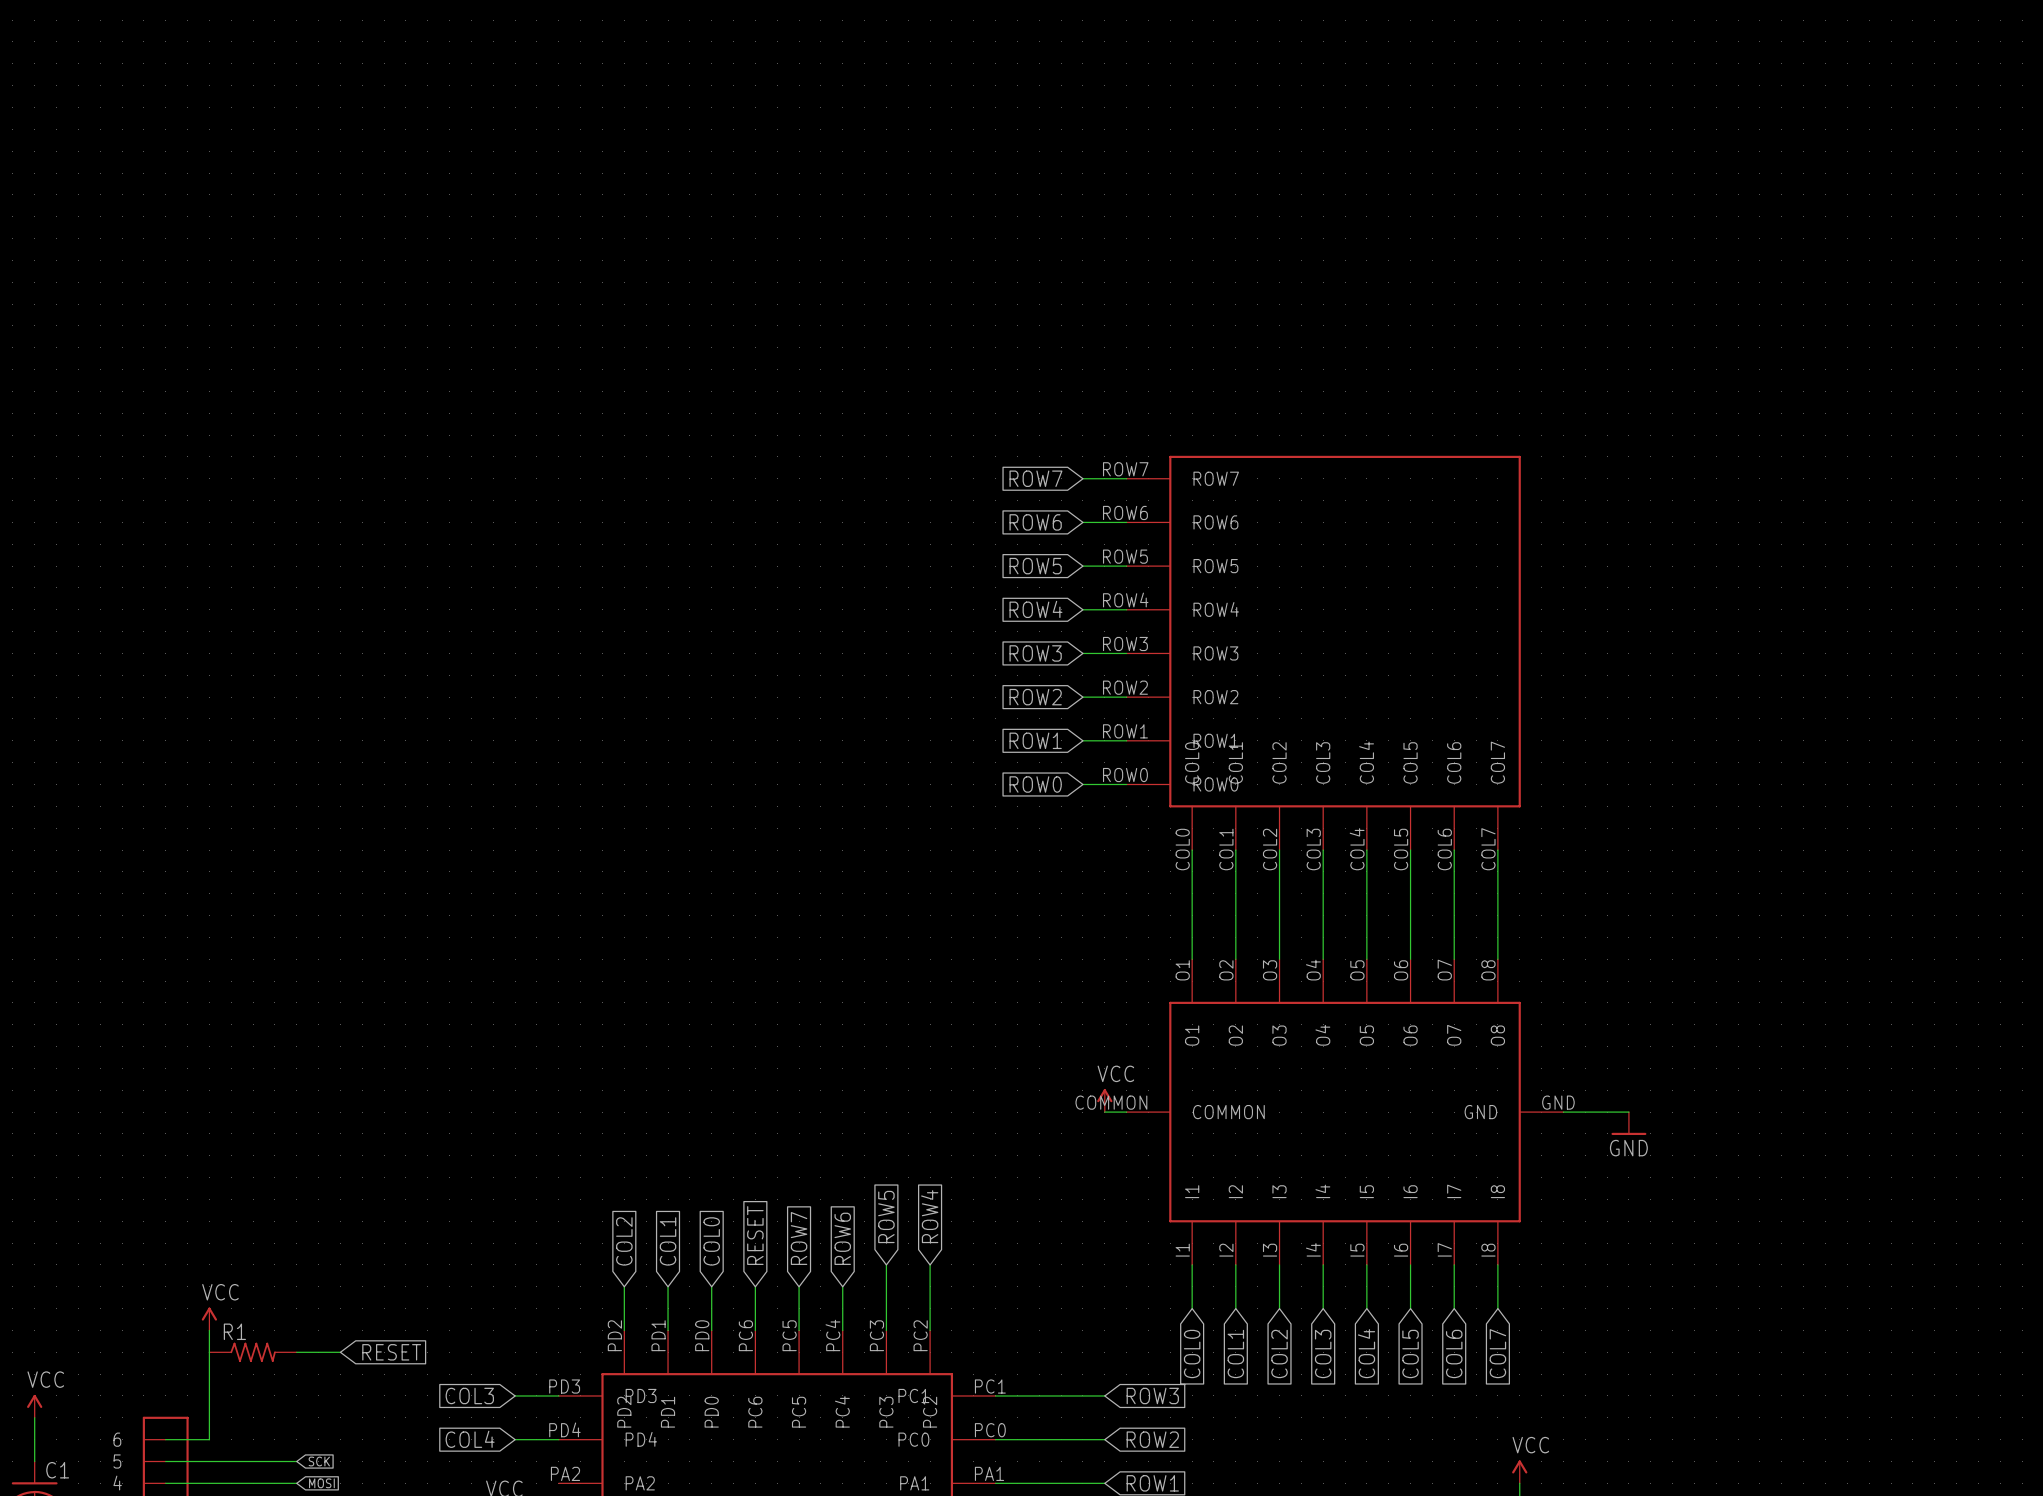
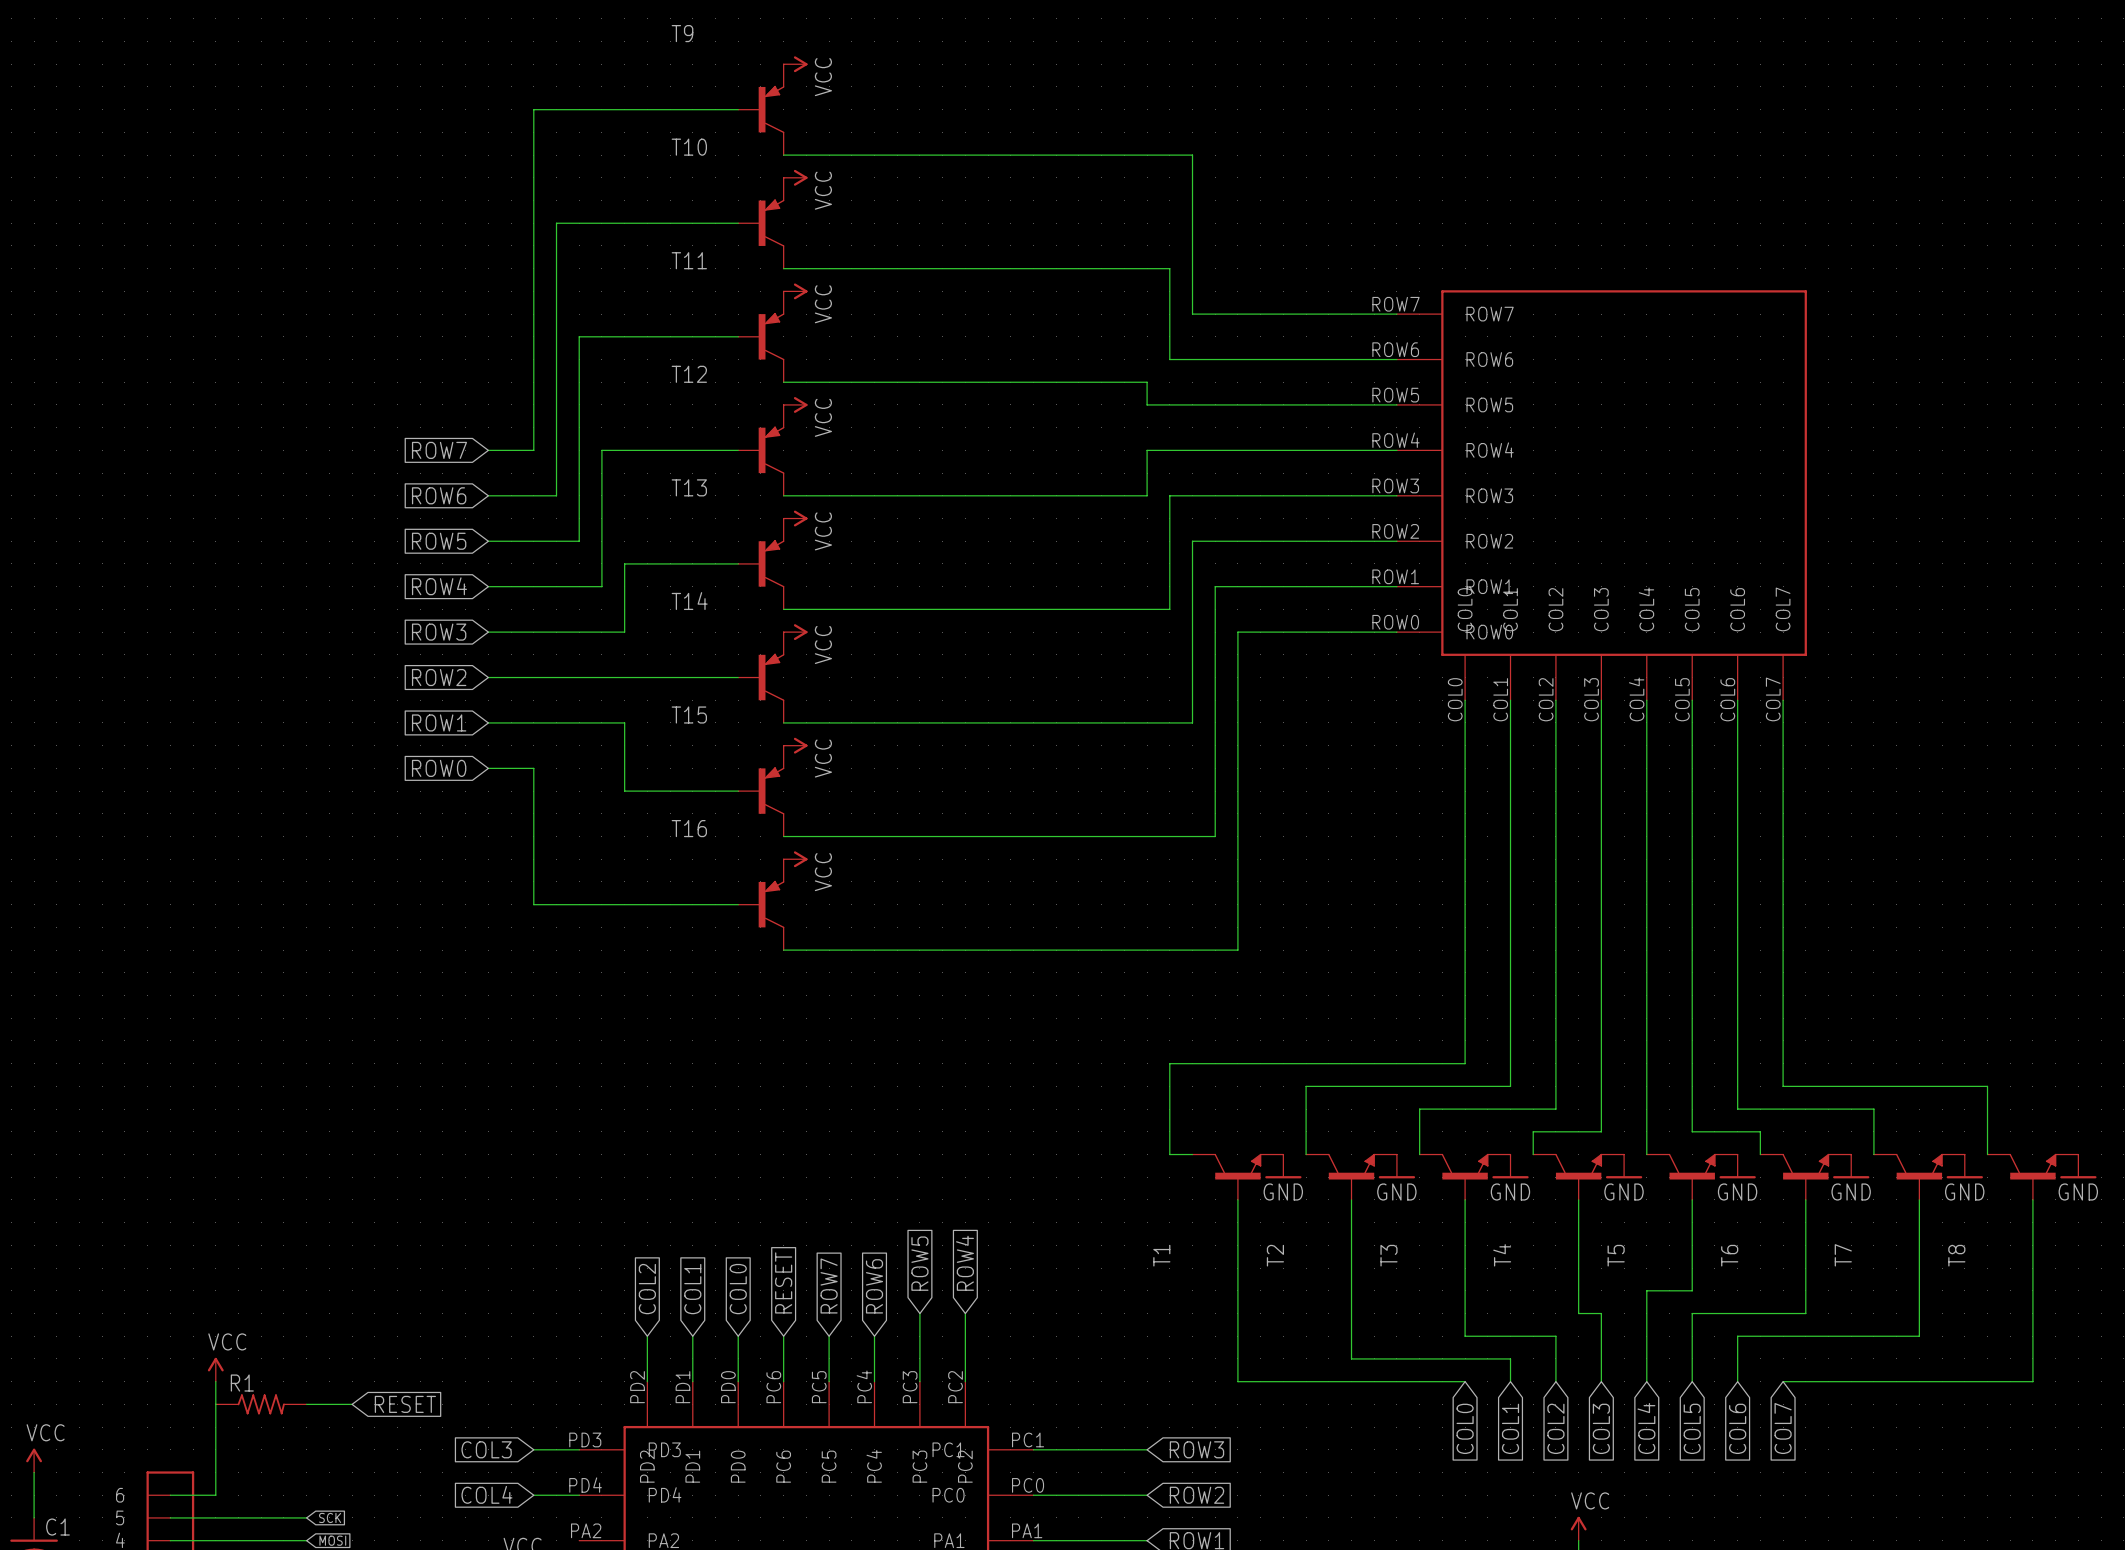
power symbol: none -> VCC (795, 64)
wire: none -> (738, 109) (533, 109) (533, 450) (488, 450)
T9: none -> (761, 109)
wire: none -> (783, 155) (1192, 155) (1192, 314) (1396, 314)
power symbol: none -> VCC (795, 177)
wire: none -> (738, 223) (556, 223) (556, 495) (488, 495)
T10: none -> (761, 223)
wire: none -> (783, 268) (1169, 268) (1169, 359) (1396, 359)
power symbol: none -> VCC (795, 291)
wire: none -> (738, 336) (579, 336) (579, 541) (488, 541)
T11: none -> (761, 336)
wire: none -> (783, 382) (1147, 382) (1147, 404) (1396, 404)
power symbol: none -> VCC (795, 404)
global label: none -> ROW7 (439, 450)
wire: none -> (738, 450) (601, 450) (601, 586) (488, 586)
T12: none -> (761, 450)
global label: none -> ROW6 (439, 495)
wire: none -> (783, 495) (1124, 495)
global label: ROW7 (1035, 478) -> none
wire: (1104, 478) (1126, 478) -> (1147, 495) (1147, 450) (1396, 450)
wire: none -> (1396, 495) (1169, 495) (1169, 609) (783, 609)
part: none -> (1601, 495)
power symbol: none -> VCC (795, 518)
global label: none -> ROW5 (439, 541)
global label: ROW6 (1035, 522) -> none
wire: (1082, 522) (1126, 522) -> none
wire: none -> (1396, 541) (1192, 541) (1192, 722) (1169, 722)
wire: none -> (738, 563) (624, 563) (624, 632) (488, 632)
T13: none -> (761, 563)
global label: none -> ROW4 (439, 586)
global label: ROW5 (1035, 566) -> none
wire: (1082, 566) (1126, 566) -> none
wire: none -> (1396, 586) (1215, 586) (1215, 836) (783, 836)
global label: none -> ROW3 (439, 632)
power symbol: none -> VCC (795, 632)
global label: ROW4 (1035, 609) -> none
wire: (1082, 609) (1126, 609) -> none
wire: none -> (1396, 632) (1237, 632) (1237, 881)
part: (1323, 652) -> none
global label: none -> ROW2 (439, 677)
wire: none -> (488, 677) (738, 677)
T14: none -> (761, 677)
global label: ROW3 (1035, 653) -> none
wire: (1082, 653) (1126, 653) -> none
wire: none -> (1465, 700) (1465, 881)
wire: none -> (1510, 700) (1510, 881)
wire: none -> (1555, 700) (1555, 881)
wire: none -> (1601, 700) (1601, 1131) (1533, 1131) (1533, 1154)
wire: none -> (1646, 700) (1646, 1154)
wire: none -> (1692, 700) (1692, 1131) (1760, 1131) (1760, 1154)
wire: none -> (1737, 700) (1737, 1109) (1873, 1109) (1873, 1154)
wire: none -> (1783, 700) (1783, 1086) (1987, 1086) (1987, 1154)
global label: none -> ROW1 (439, 722)
wire: none -> (488, 722) (624, 722) (624, 791) (738, 791)
wire: none -> (783, 722) (1124, 722)
global label: ROW2 (1035, 697) -> none
power symbol: none -> VCC (795, 745)
global label: none -> ROW0 (439, 768)
wire: none -> (488, 768) (533, 768) (533, 904) (738, 904)
global label: ROW1 (1035, 740) -> none
wire: (1082, 740) (1126, 740) -> none
T15: none -> (761, 791)
global label: ROW0 (1035, 784) -> none
wire: (1082, 784) (1126, 784) -> none
power symbol: none -> VCC (795, 859)
wire: (1235, 850) (1235, 959) -> none
wire: (1279, 850) (1279, 959) -> none
wire: (1323, 850) (1323, 959) -> none
wire: (1366, 850) (1366, 959) -> none
T16: none -> (761, 904)
wire: (1192, 915) (1192, 959) -> (1237, 950) (783, 950)
wire: none -> (1465, 995) (1465, 1063) (1169, 1063) (1169, 1154) (1192, 1154)
wire: none -> (1510, 995) (1510, 1086) (1306, 1086) (1306, 1154)
wire: none -> (1555, 995) (1555, 1109) (1419, 1109) (1419, 1154)
power symbol: VCC (1104, 1100) -> none
wire: (1104, 1112) (1126, 1112) -> none
part: (1345, 1112) -> none
wire: (1563, 1112) (1628, 1112) -> none
power symbol: none -> GND (1283, 1166)
power symbol: none -> GND (1396, 1166)
power symbol: none -> GND (1510, 1166)
power symbol: none -> GND (1624, 1166)
power symbol: GND (1628, 1123) -> none
power symbol: none -> GND (1737, 1166)
power symbol: none -> GND (1851, 1166)
power symbol: none -> GND (1964, 1166)
power symbol: none -> GND (2078, 1166)
T1: none -> (1237, 1176)
T2: none -> (1351, 1176)
T3: none -> (1465, 1176)
T4: none -> (1578, 1176)
T5: none -> (1692, 1176)
T6: none -> (1805, 1176)
T7: none -> (1919, 1176)
T8: none -> (2032, 1176)
wire: none -> (1237, 1199) (1237, 1313)
wire: none -> (1351, 1199) (1351, 1358) (1510, 1358) (1510, 1381)
wire: none -> (1465, 1199) (1465, 1313)
wire: none -> (1578, 1199) (1578, 1313) (1601, 1313) (1601, 1381)
wire: none -> (1692, 1199) (1692, 1290) (1646, 1290) (1646, 1381)
wire: none -> (1805, 1199) (1805, 1313) (1692, 1313) (1692, 1381)
wire: none -> (1919, 1199) (1919, 1336) (1737, 1336) (1737, 1381)
wire: none -> (2032, 1199) (2032, 1381) (1783, 1381)
wire: (1235, 1264) (1235, 1308) -> none
wire: (1279, 1264) (1279, 1308) -> none
wire: (1323, 1264) (1323, 1308) -> none
wire: (1366, 1264) (1366, 1308) -> none
wire: (1454, 1264) (1454, 1308) -> none
wire: (1497, 1264) (1497, 1286) -> (1555, 1358) (1555, 1381)
wire: (1410, 1286) (1410, 1308) -> (1465, 1336) (1555, 1336)
wire: none -> (1237, 1358) (1237, 1381) (1465, 1381)
global label: COL0 (1192, 1353) -> none
global label: COL1 (1235, 1353) -> none
global label: COL2 (1279, 1353) -> none
global label: COL3 (1323, 1353) -> none
global label: COL4 (1366, 1353) -> none
global label: COL5 (1410, 1353) -> COL0 (1465, 1428)
global label: COL6 (1454, 1353) -> COL1 (1510, 1428)
global label: COL7 (1497, 1353) -> COL2 (1555, 1428)
global label: none -> COL3 (1601, 1428)
global label: none -> COL4 (1646, 1428)
global label: none -> COL5 (1692, 1428)
global label: none -> COL6 (1737, 1428)
global label: none -> COL7 (1783, 1428)

